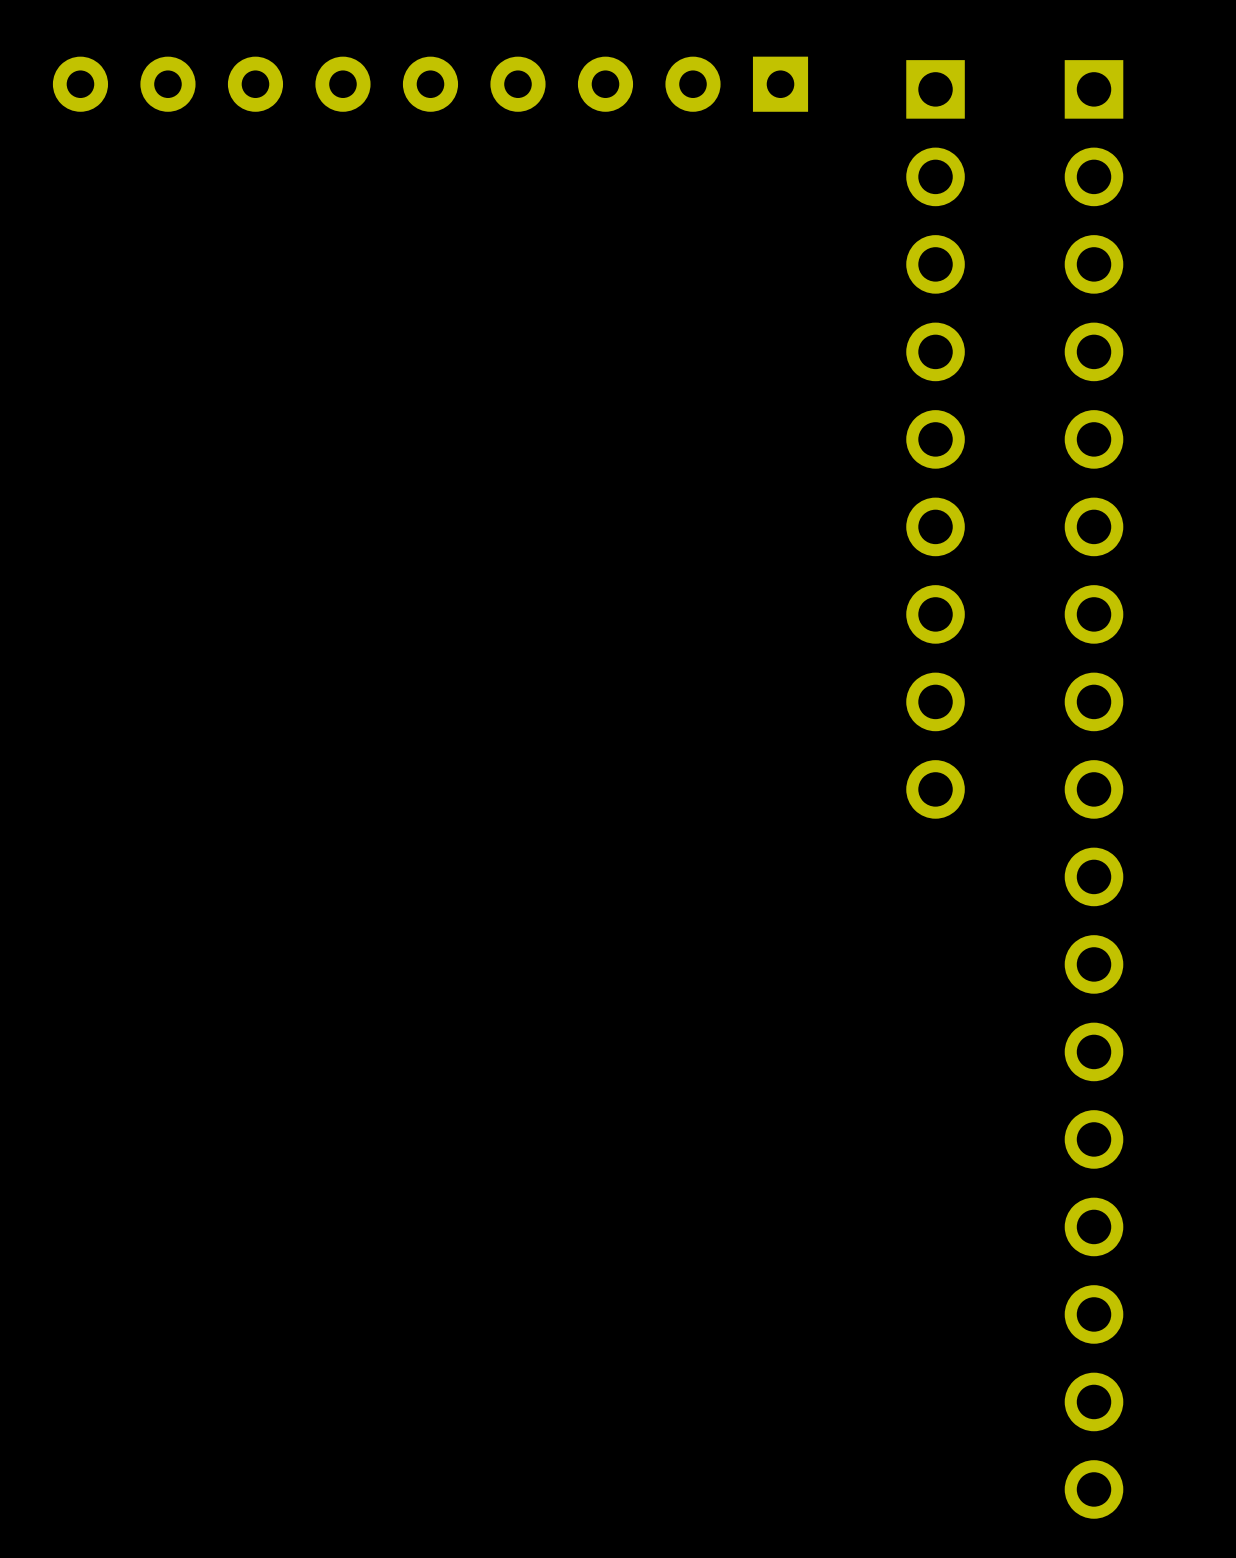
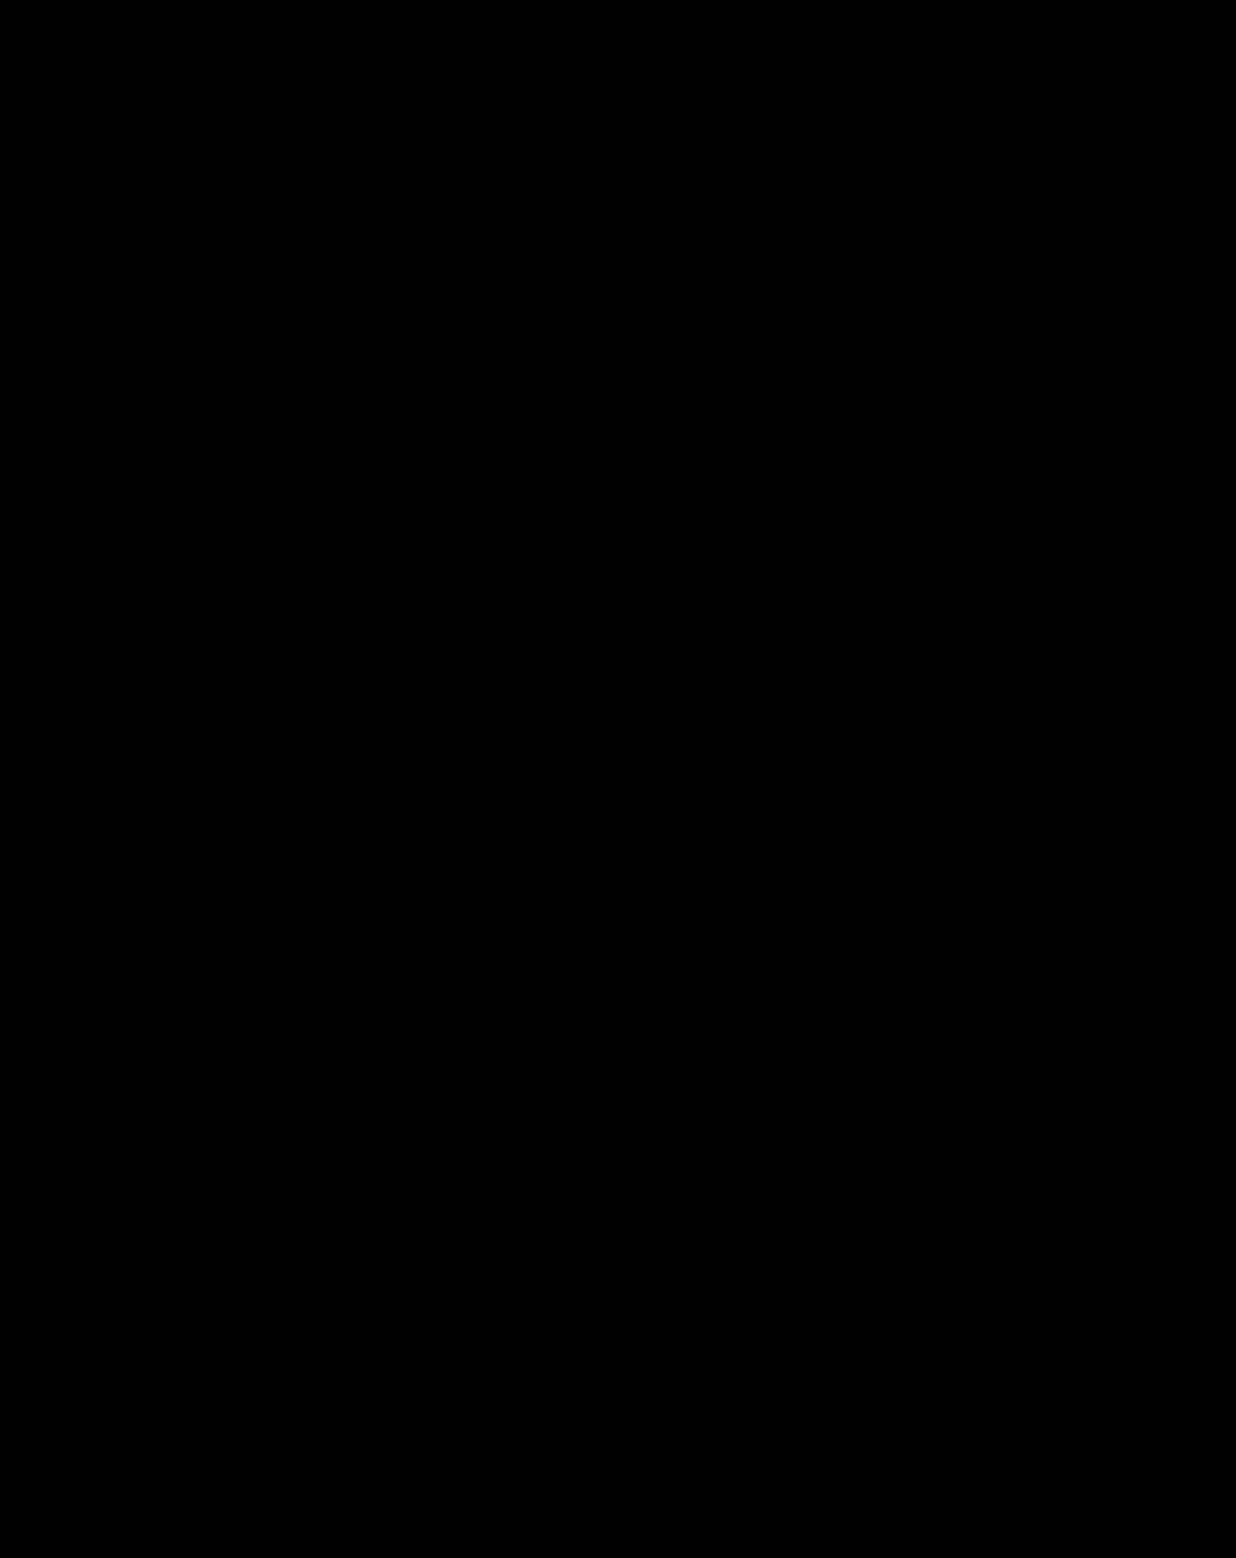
part: (430, 84) -> none
part: (935, 439) -> none
part: (1094, 789) -> none

